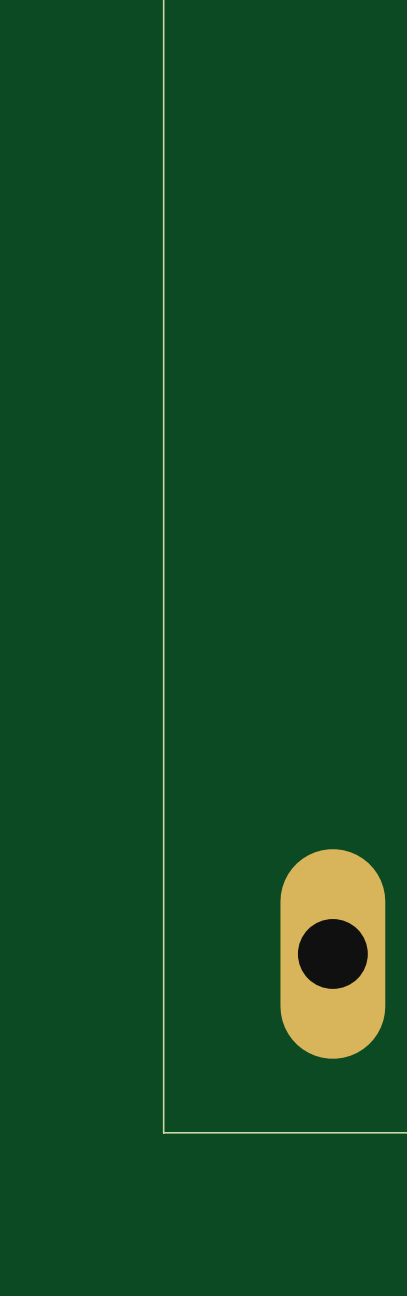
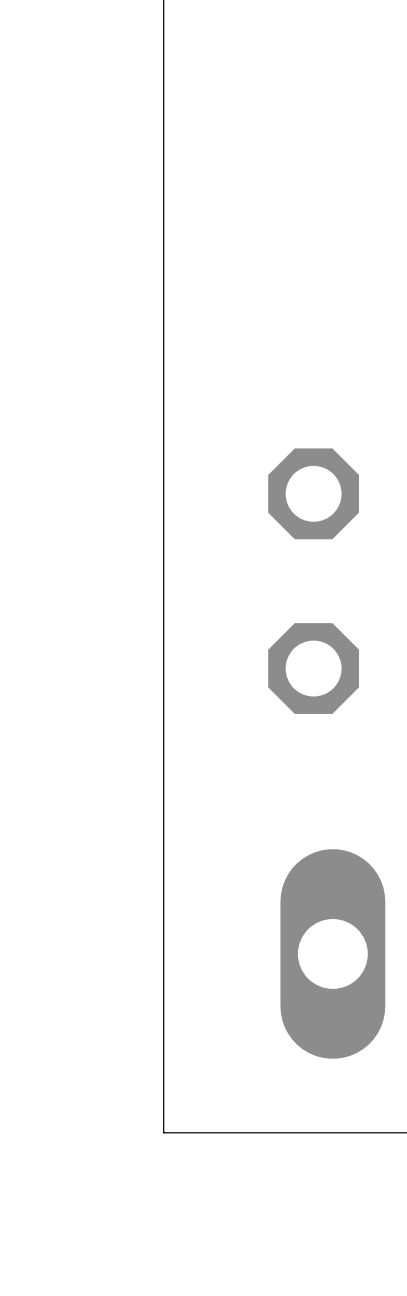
part: none -> (313, 581)

